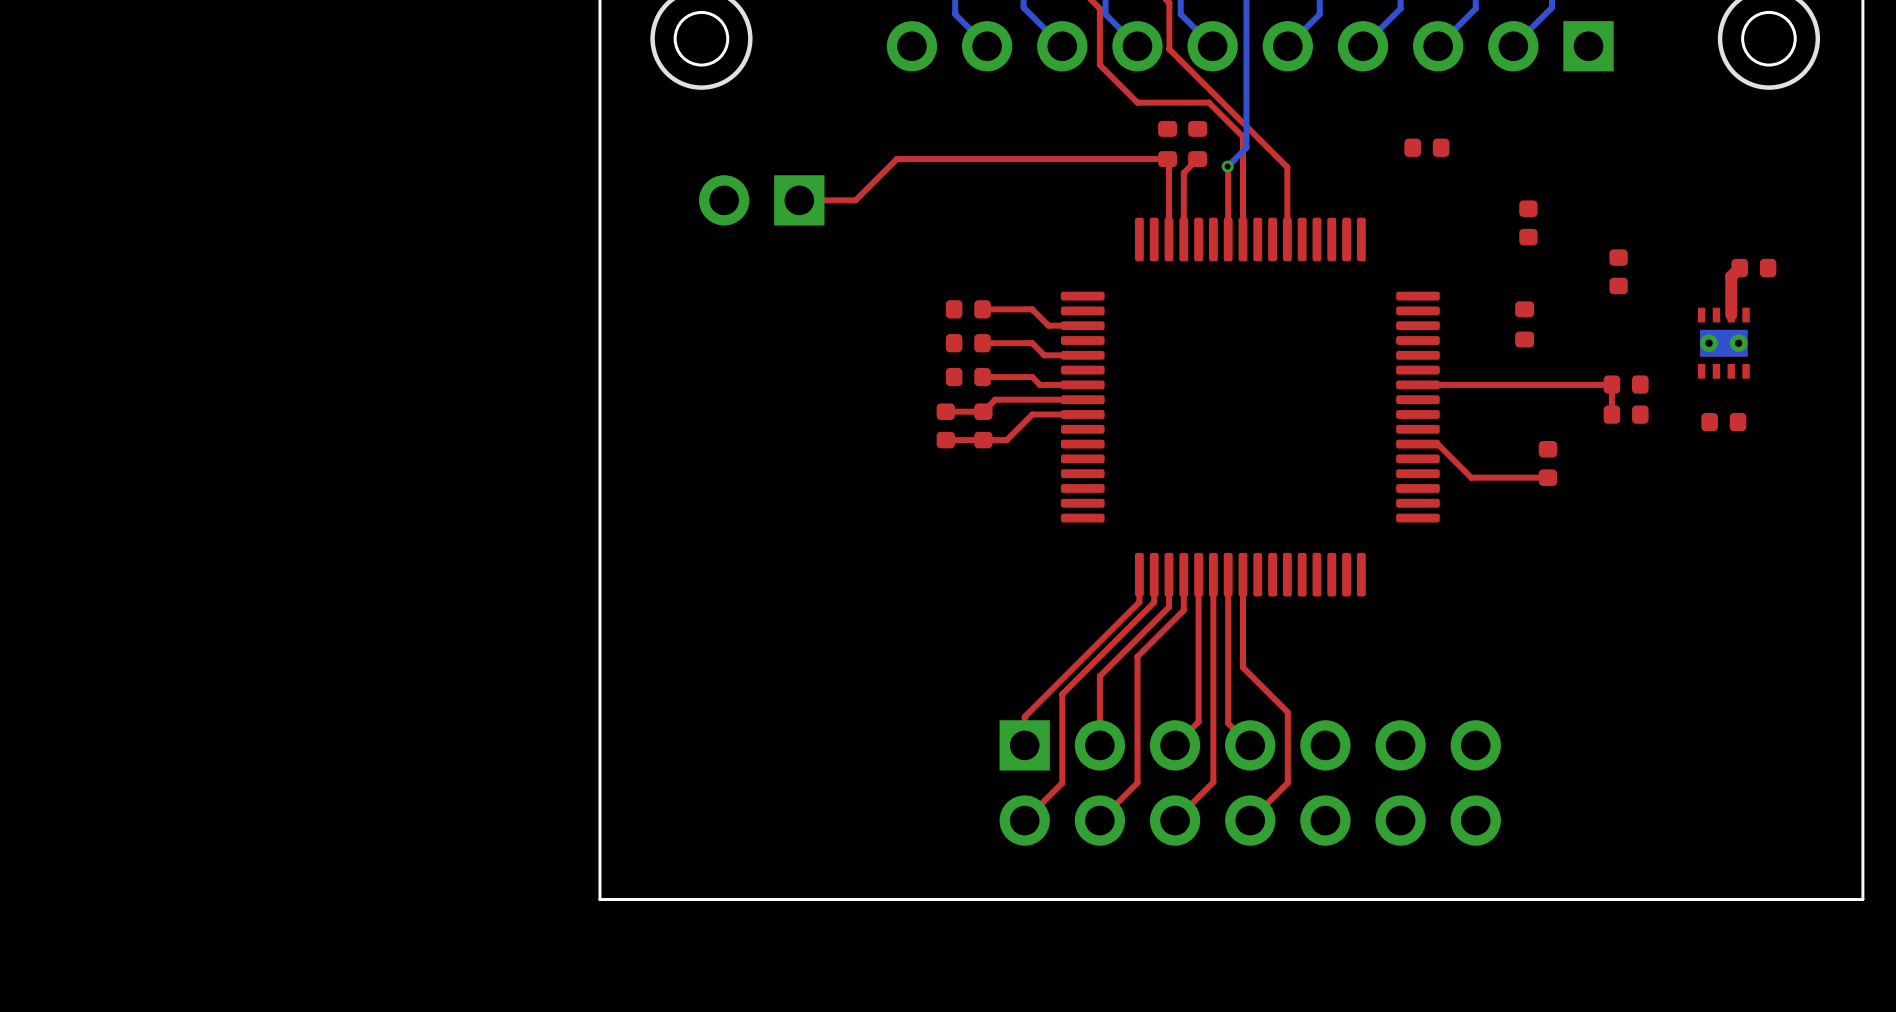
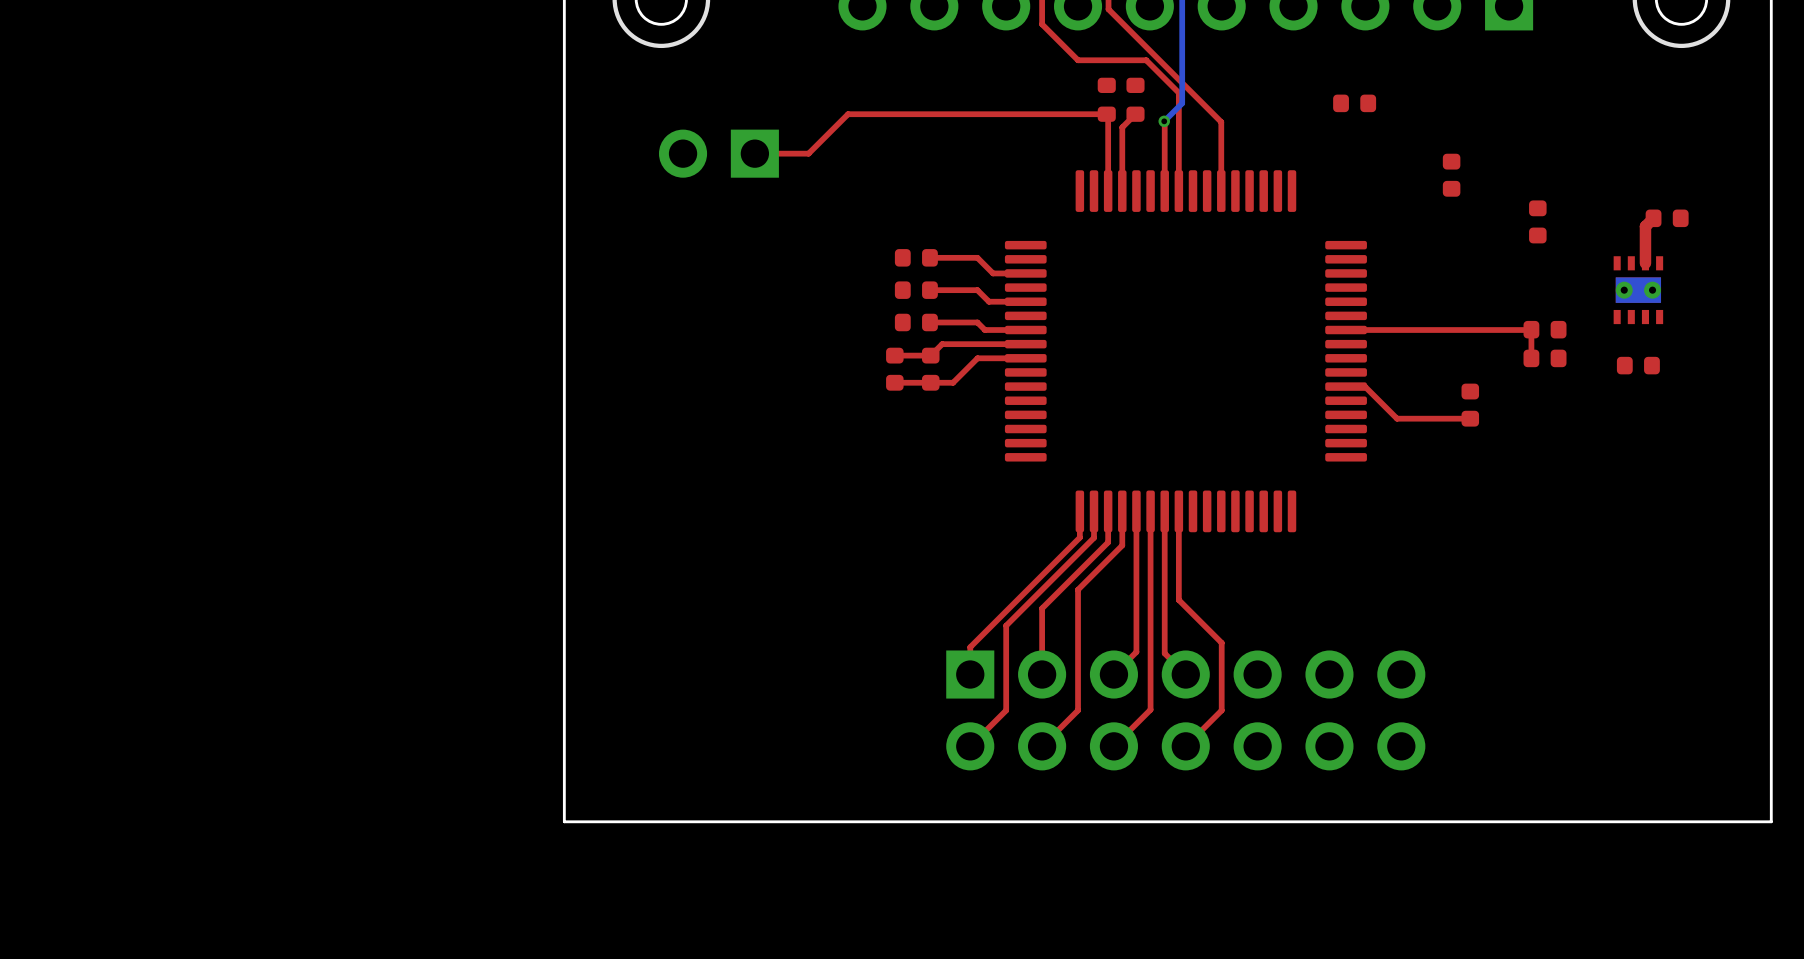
part: (1524, 324) -> none

